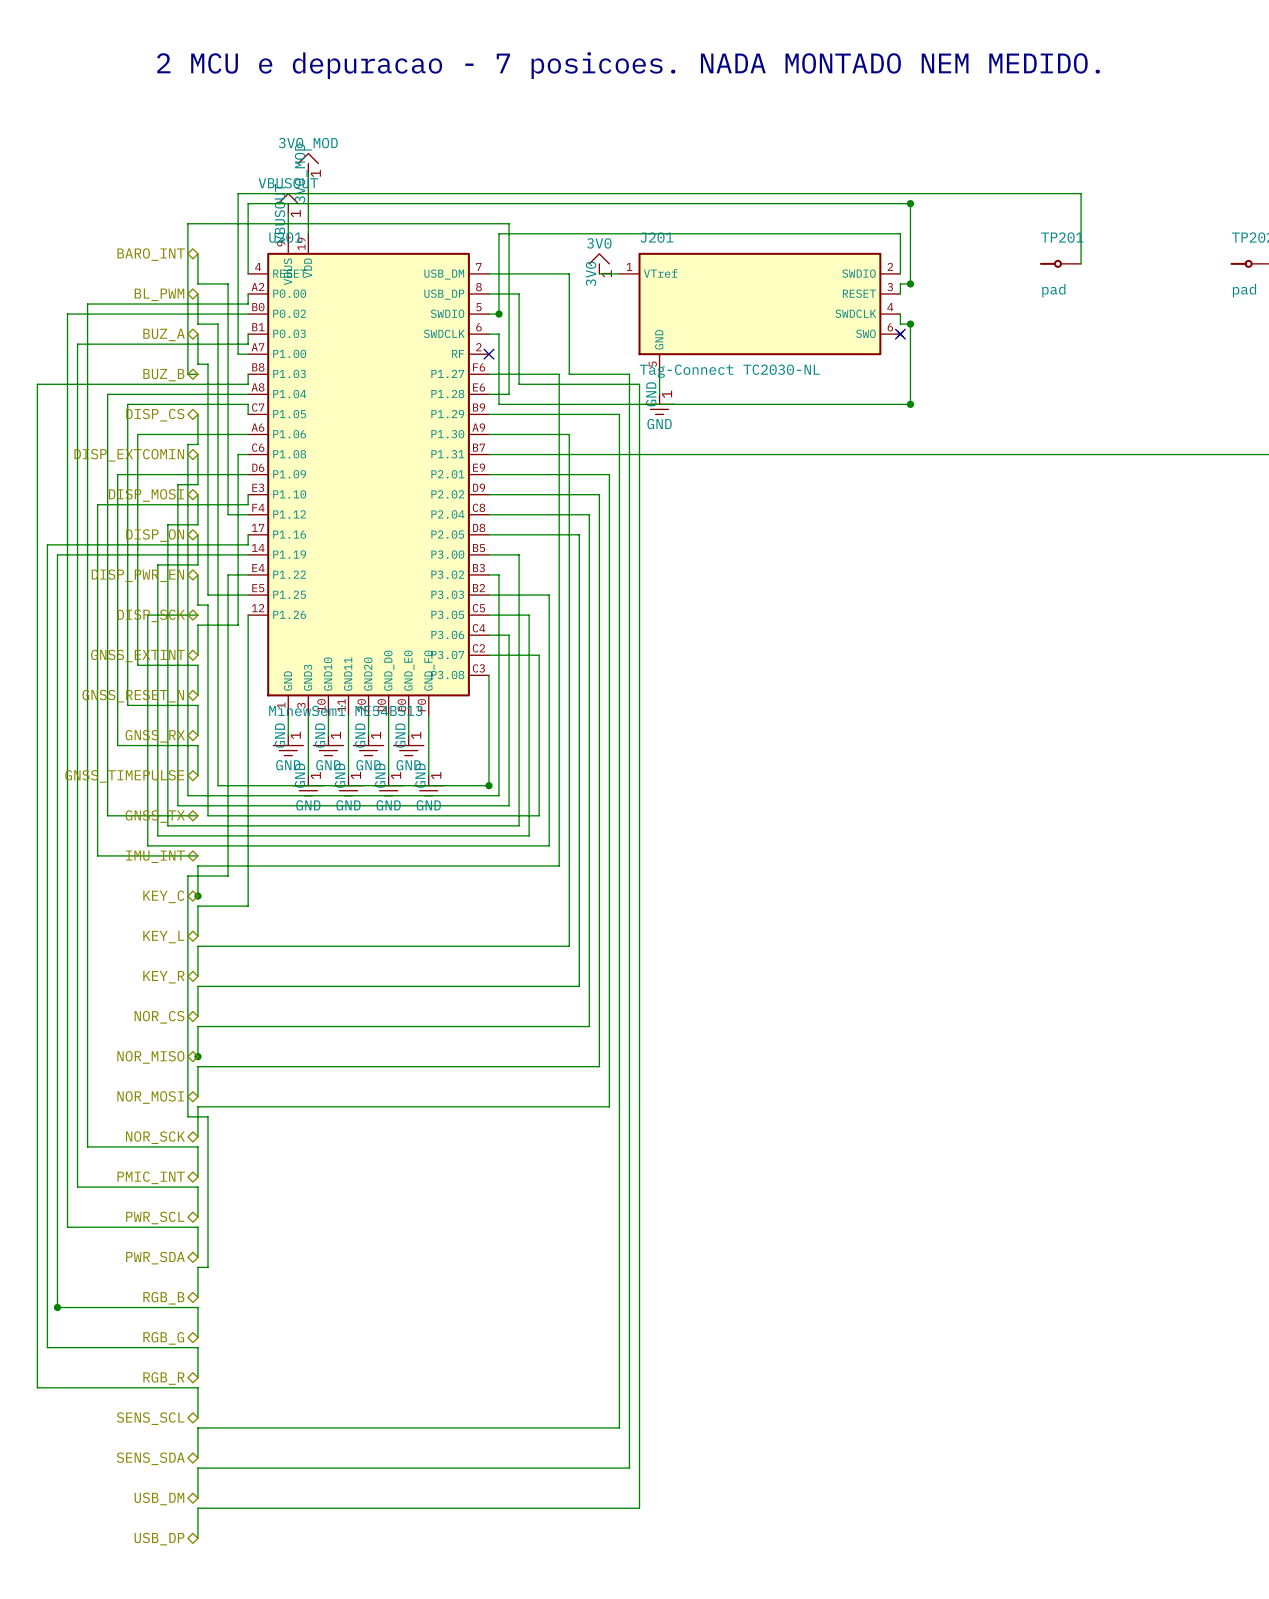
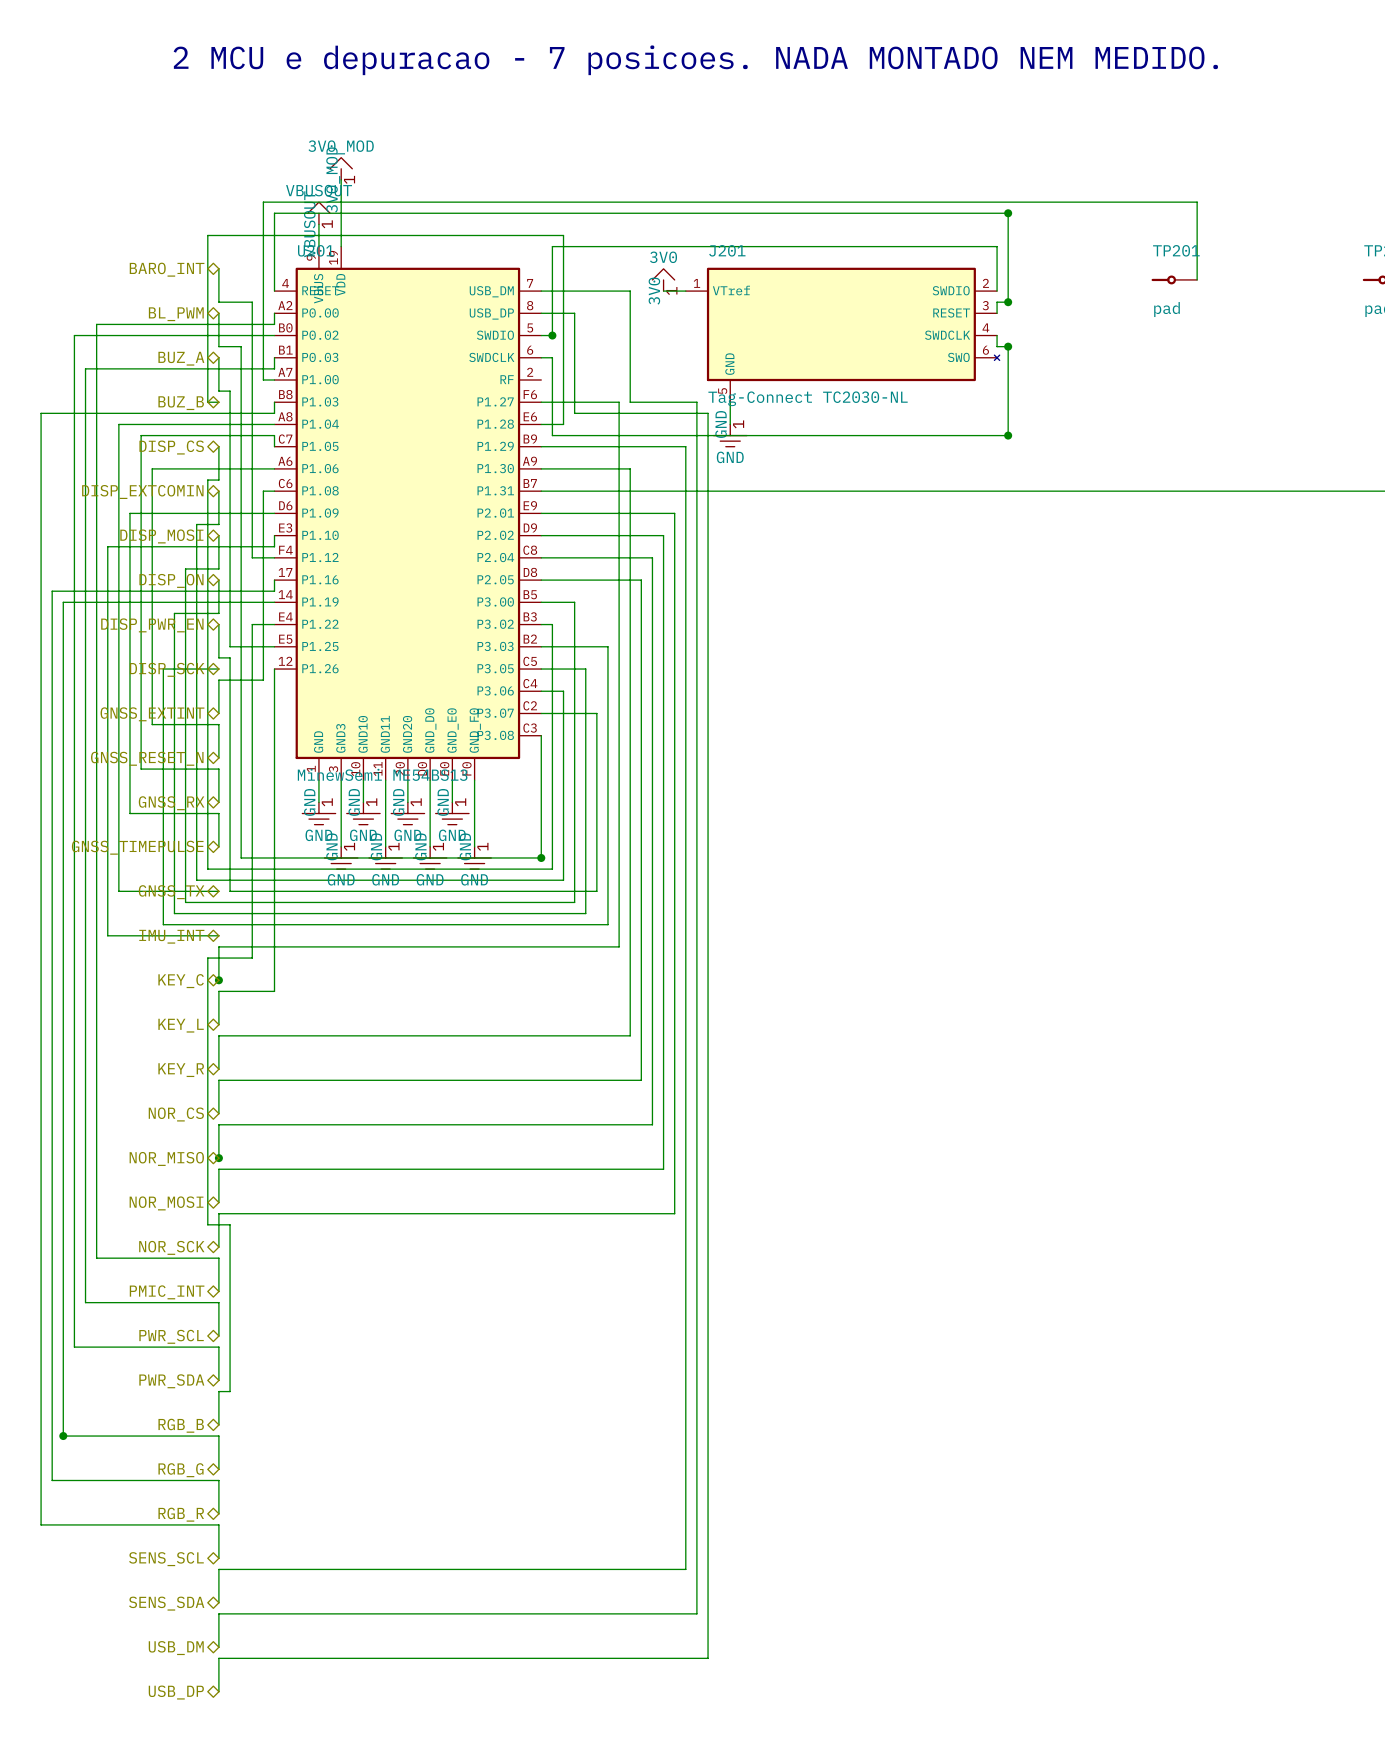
no-connect mark: (900, 334) -> none
no-connect mark: (488, 354) -> none

